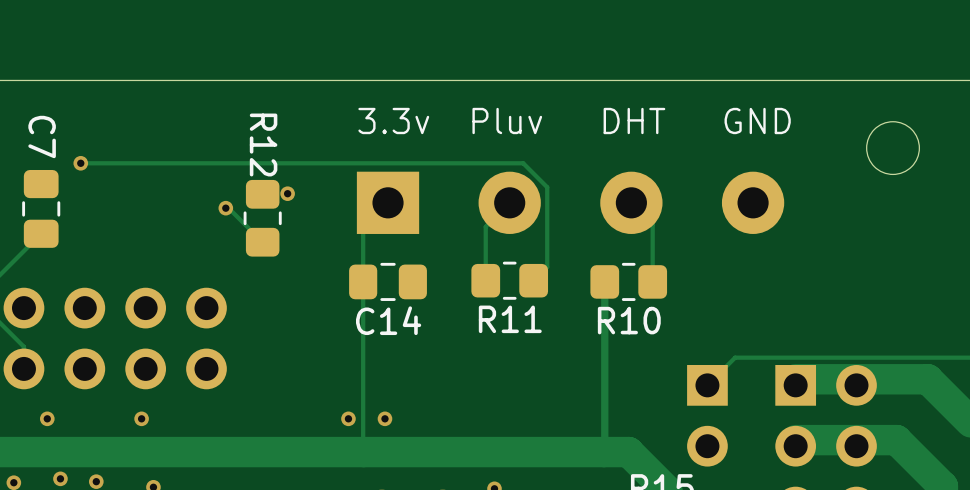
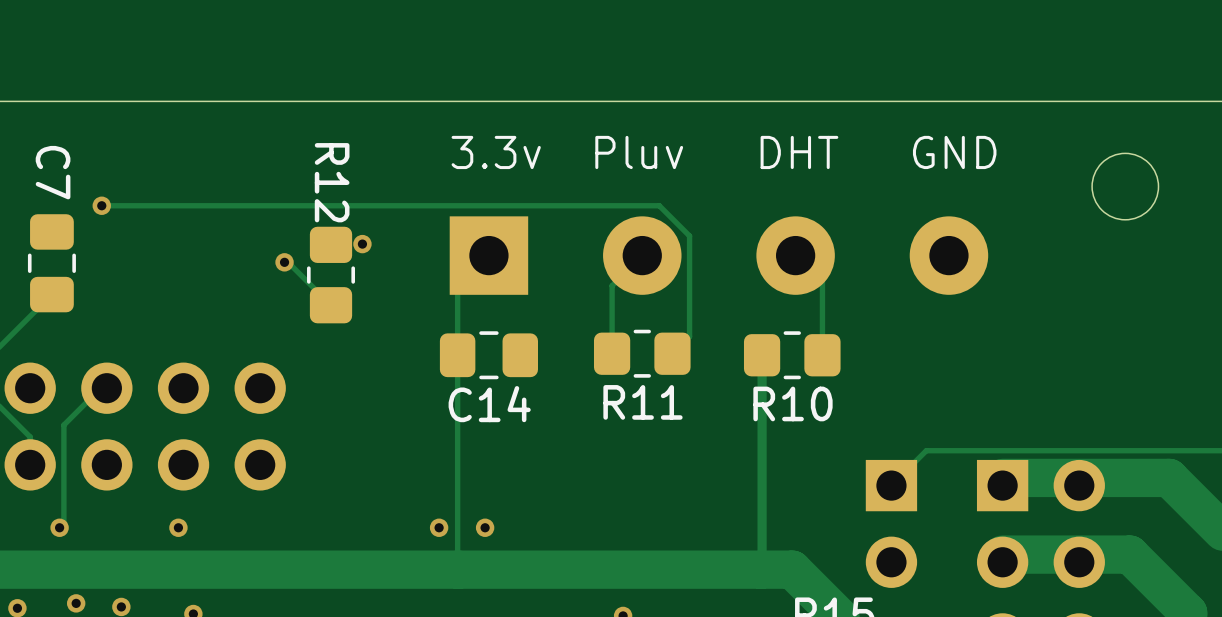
track: none -> (106, 382) (63, 425) (63, 523) (59, 527)

